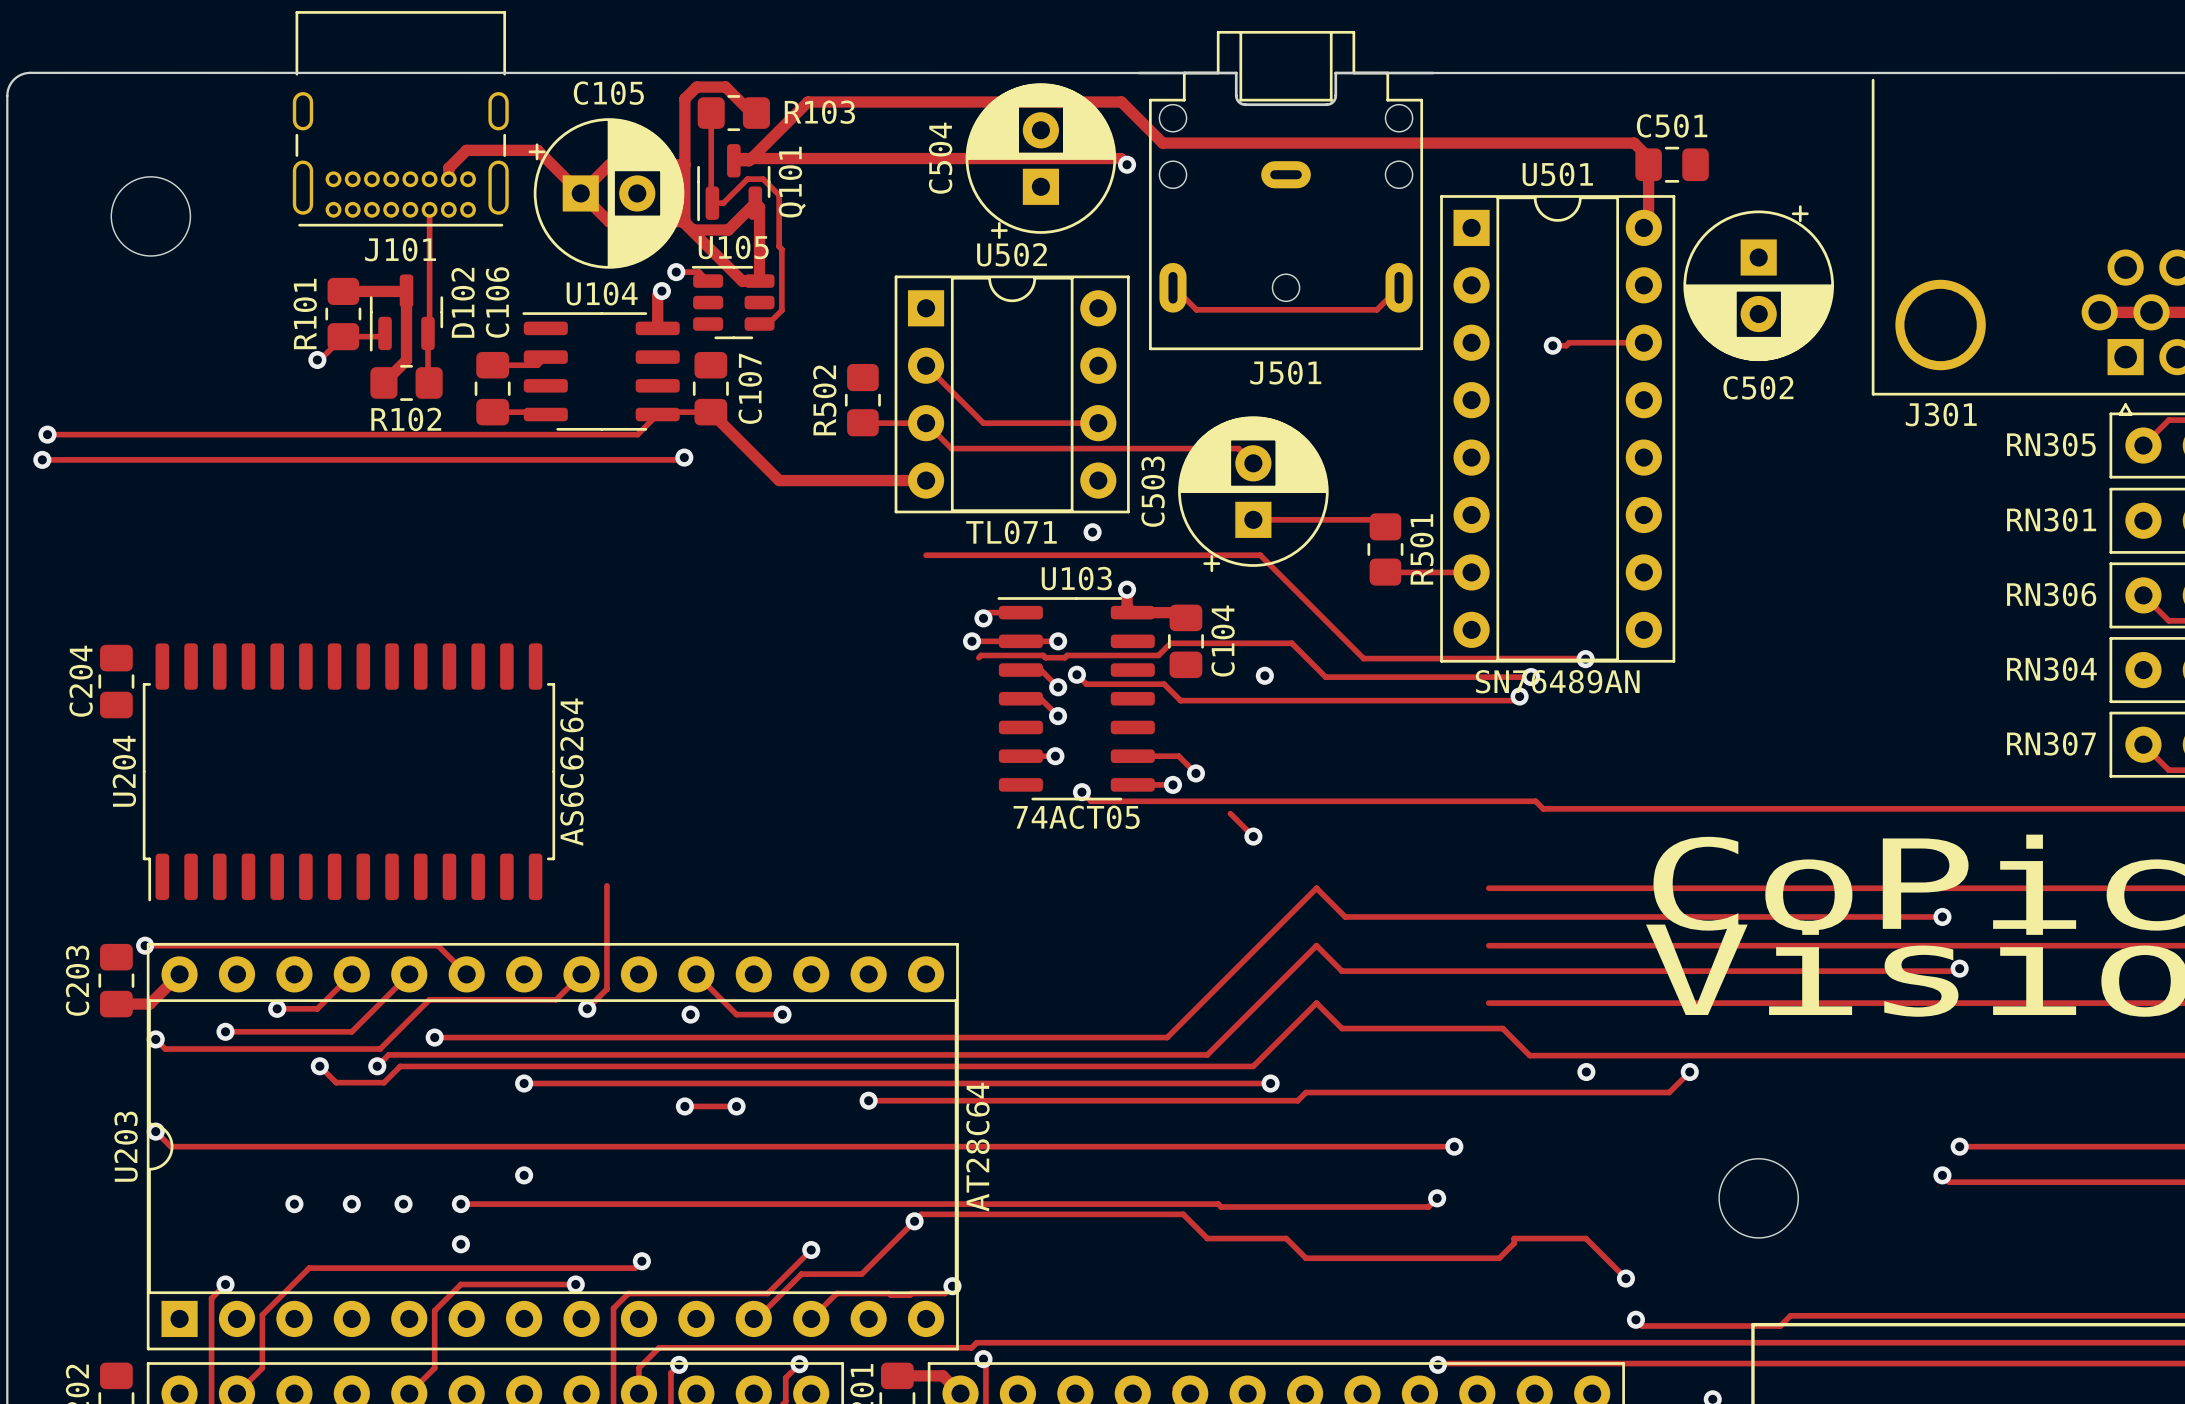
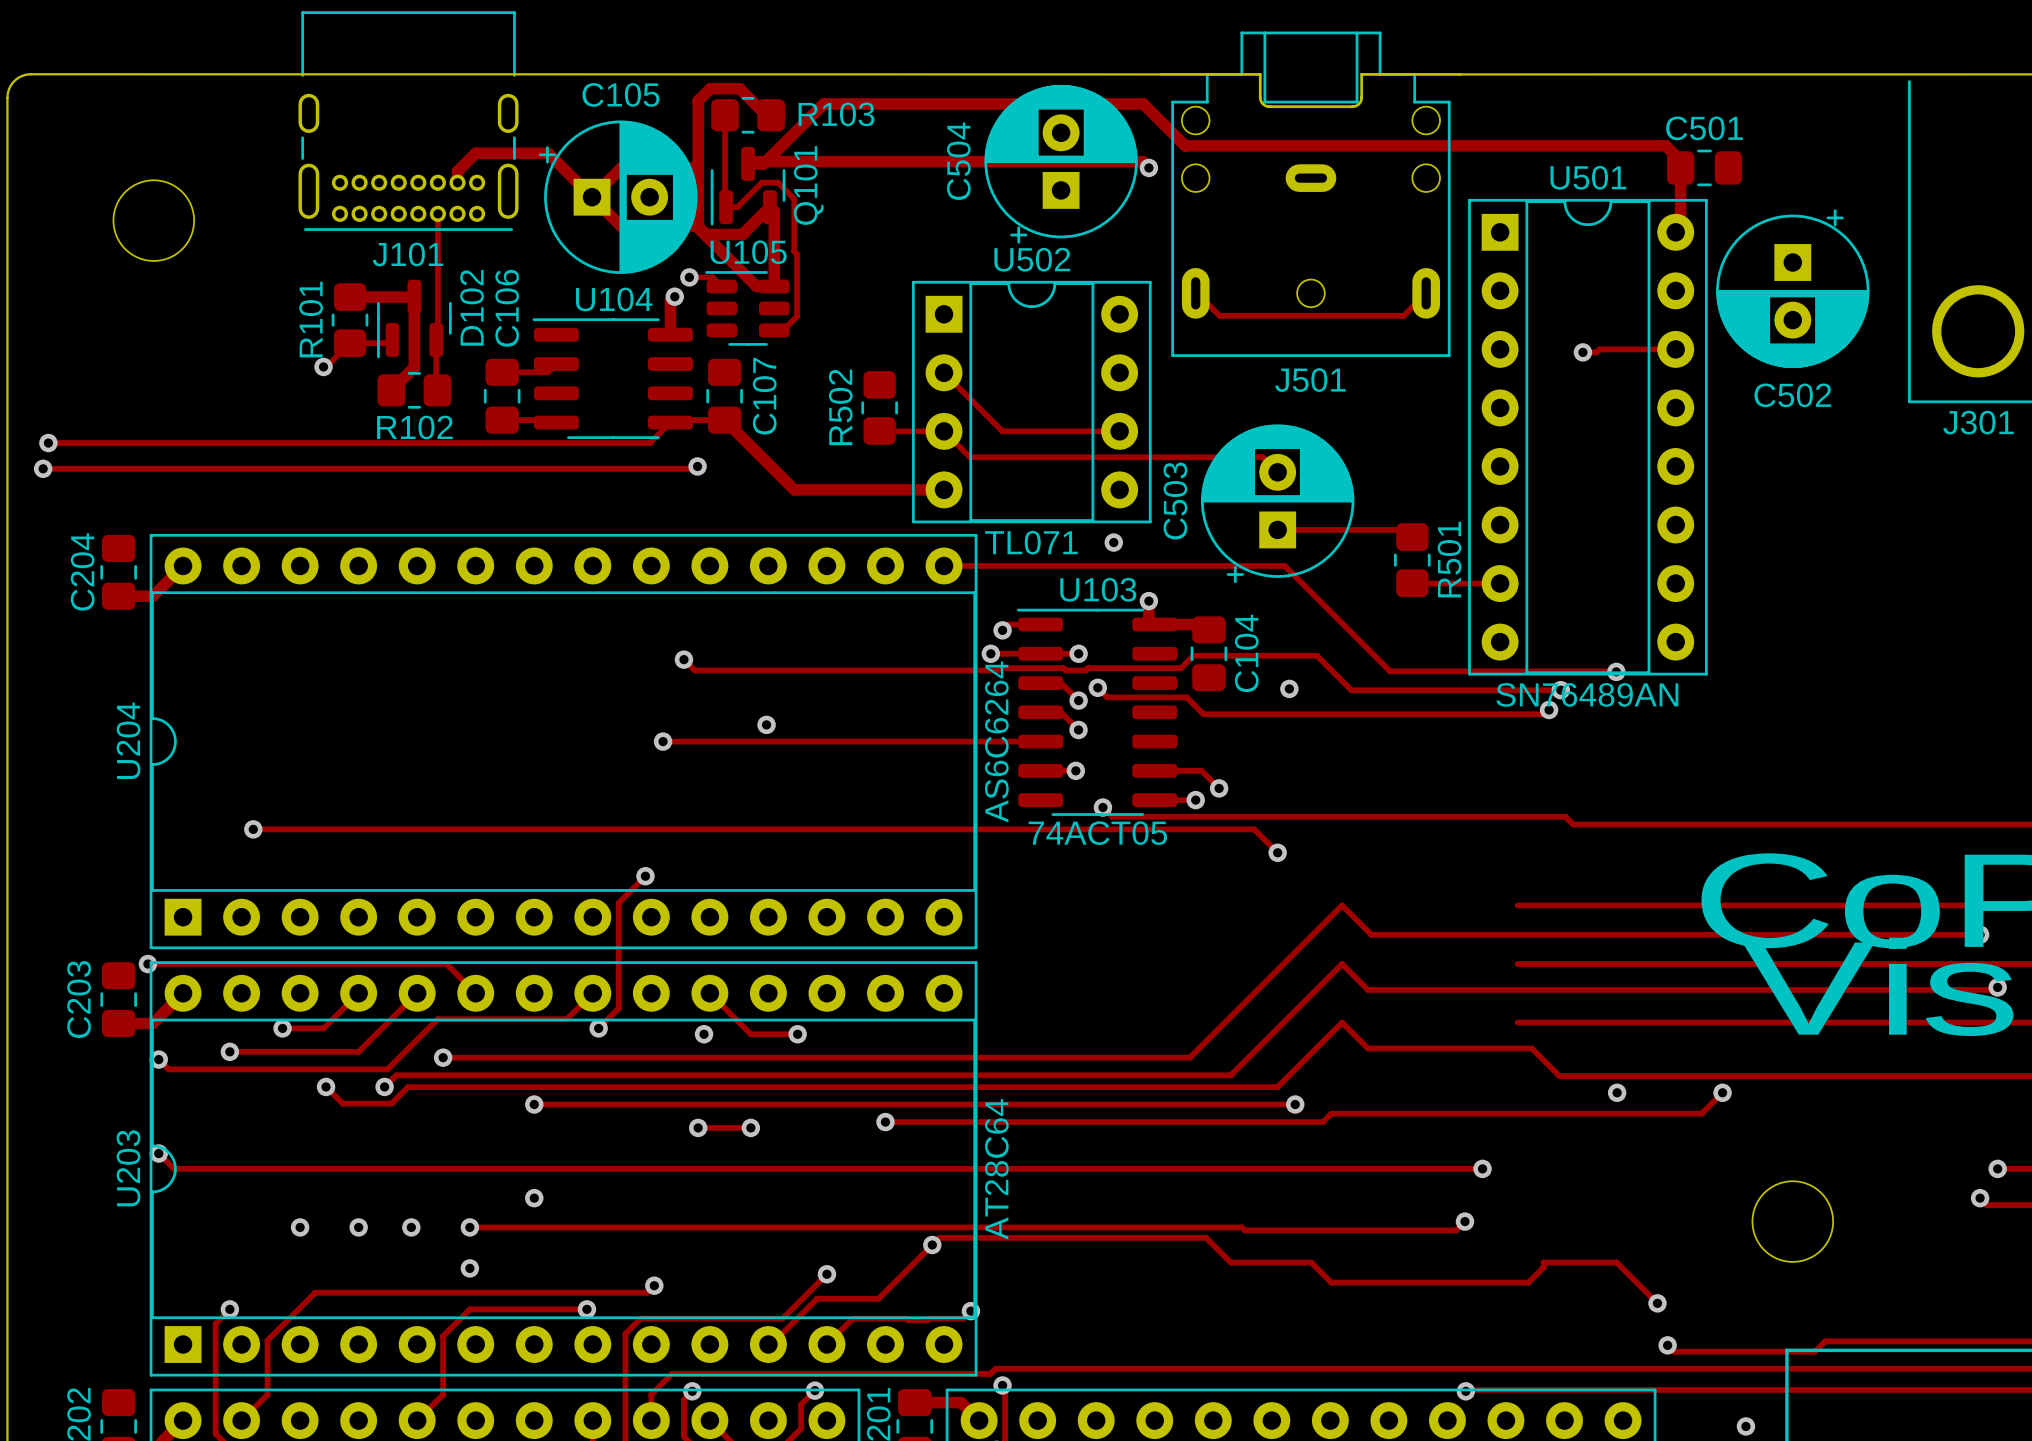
track: none -> (183, 565) (152, 596) (118, 596)
U204 footprint: [142, 643, 556, 902] -> [149, 533, 978, 950]
track: none -> (683, 659) (694, 670) (997, 670)
via: none -> (683, 659)
C204 position: (116, 681) -> (118, 572)
via: none -> (766, 724)
track: none -> (663, 741) (1040, 741)
via: none -> (663, 741)
U204 name position: U204 (124, 771) -> U204 (128, 740)
U204 value position: AS6C6264 (571, 772) -> AS6C6264 (996, 742)
track: none -> (253, 829) (1254, 829)
via: none -> (253, 829)
track: none -> (645, 876) (618, 902)
via: none -> (645, 876)

